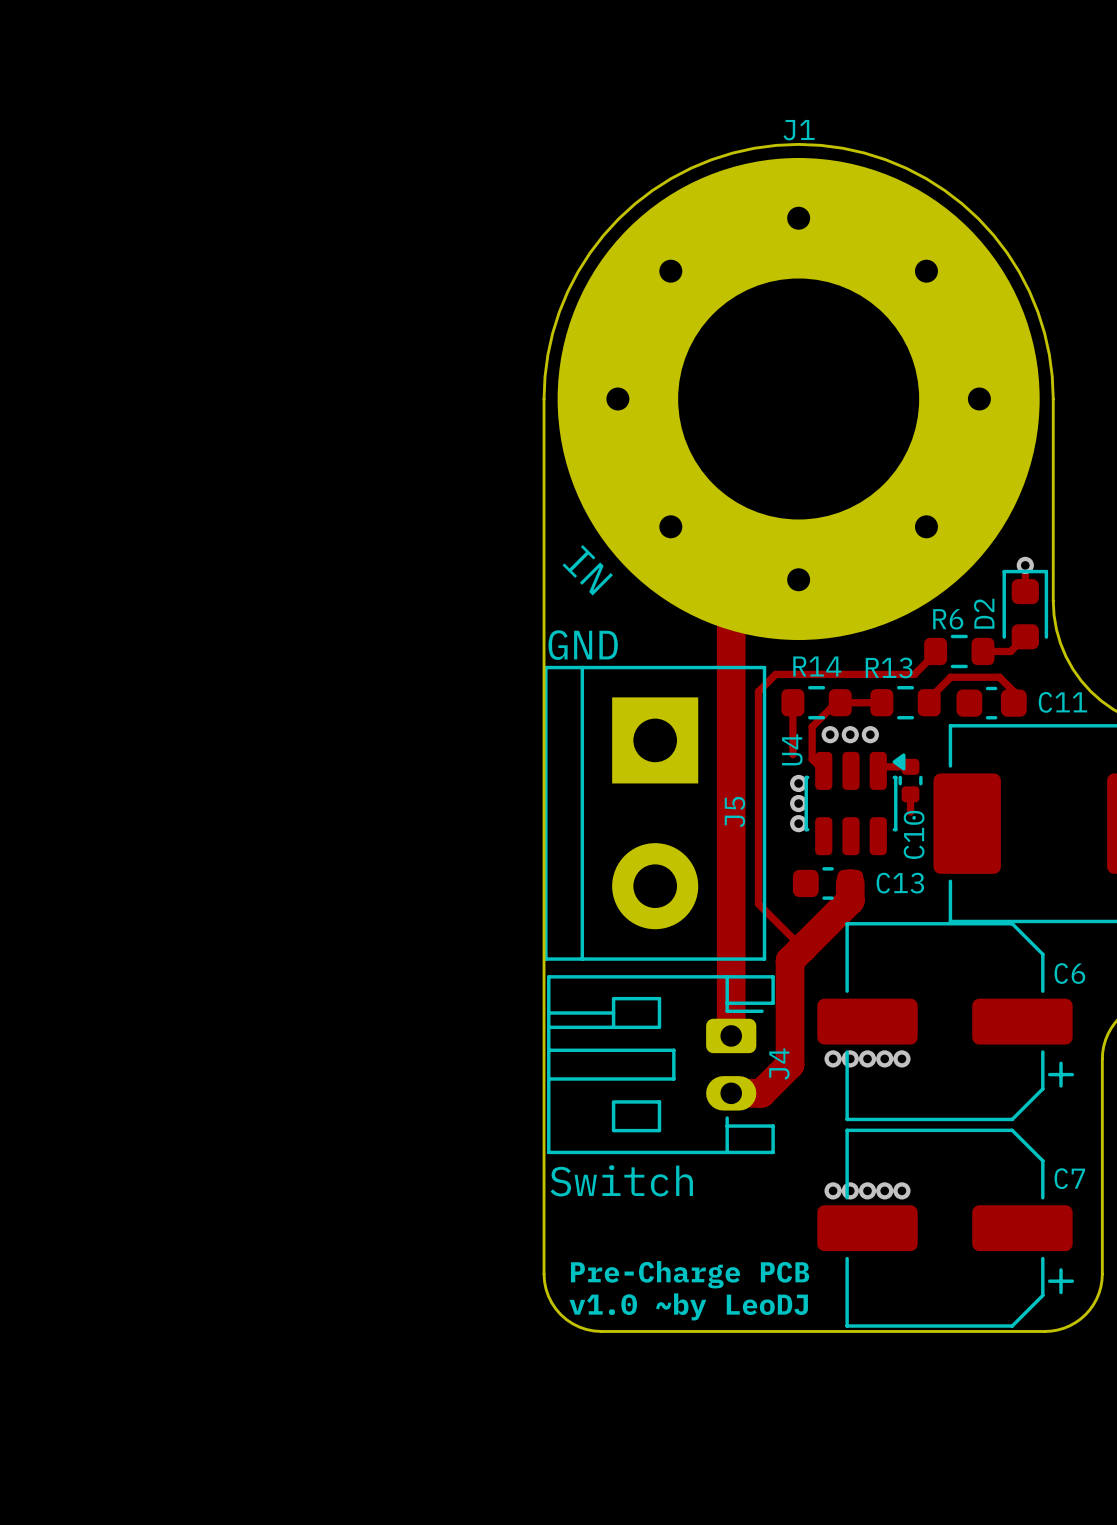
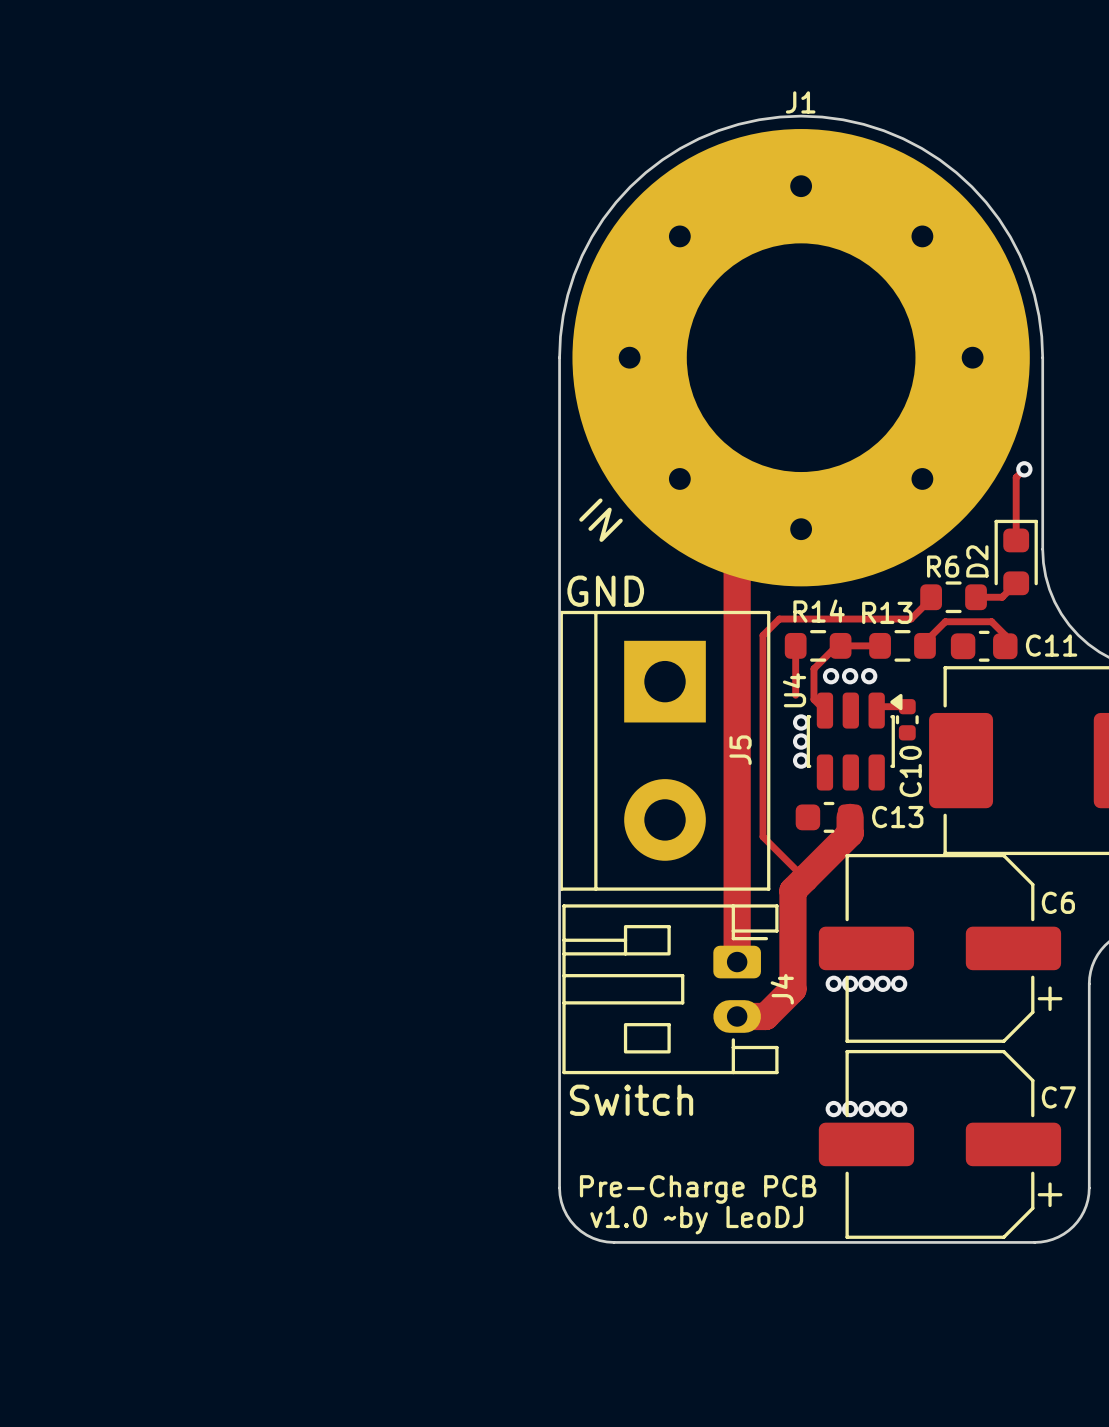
track: none -> (1024, 469) (1016, 477) (1016, 515)
via position: (1025, 565) -> (1024, 469)
track: (910, 794) (910, 812) -> none

